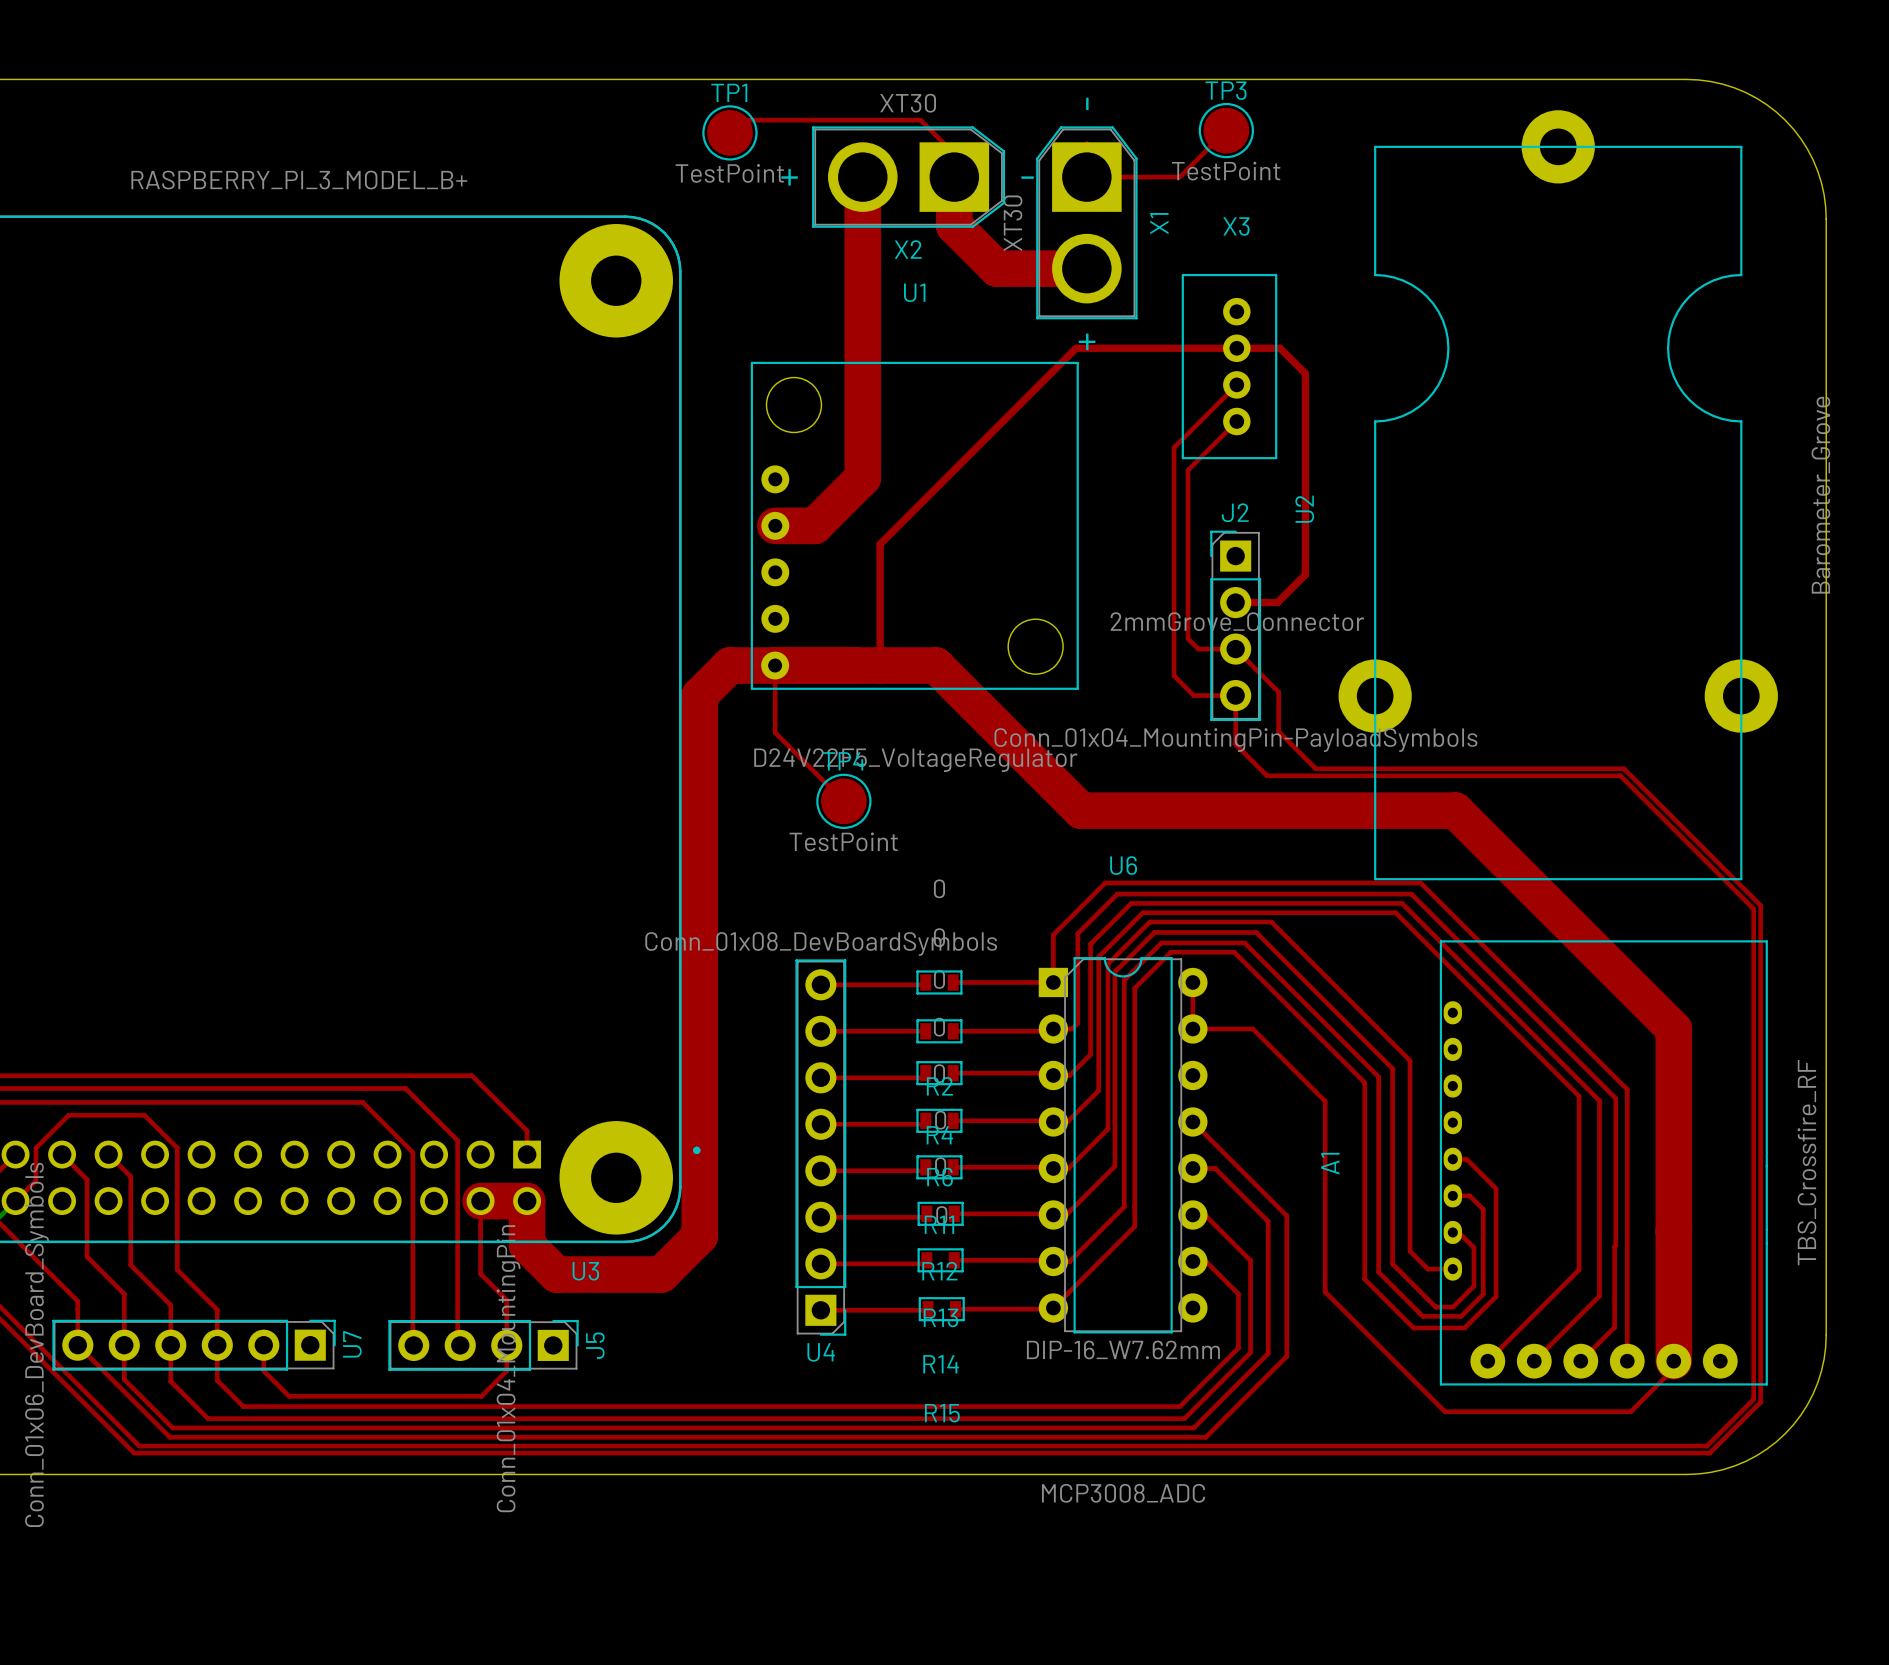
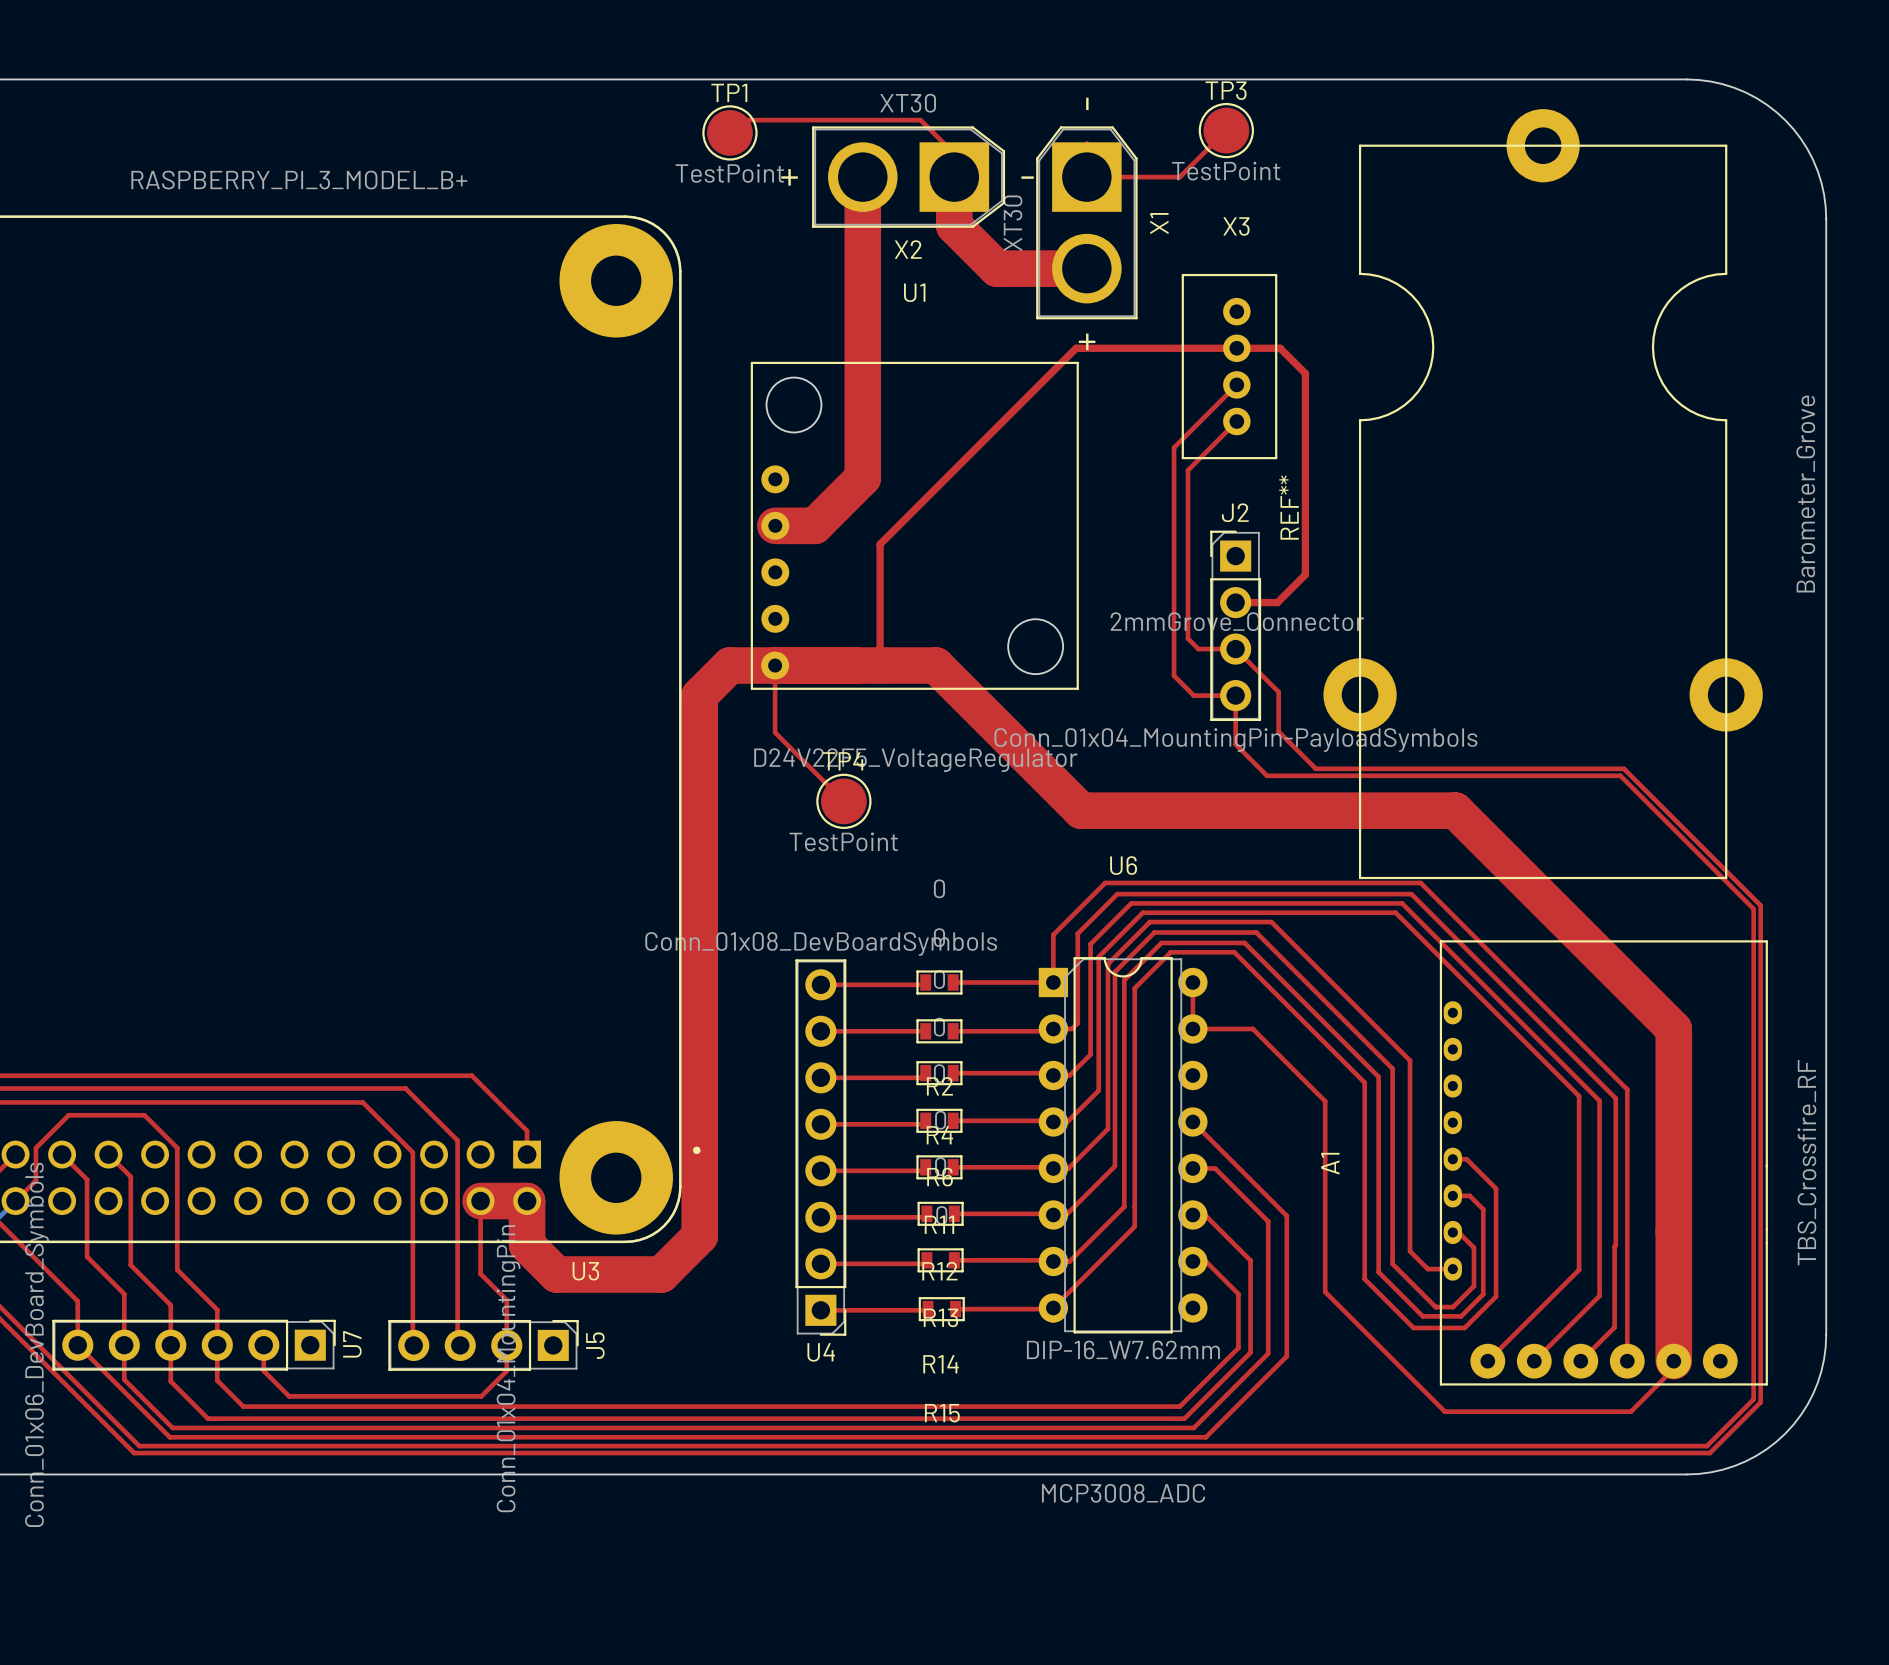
U2 position: (1558, 495) -> (1543, 494)
U2 name: U2 (1304, 509) -> REF** (1289, 507)

